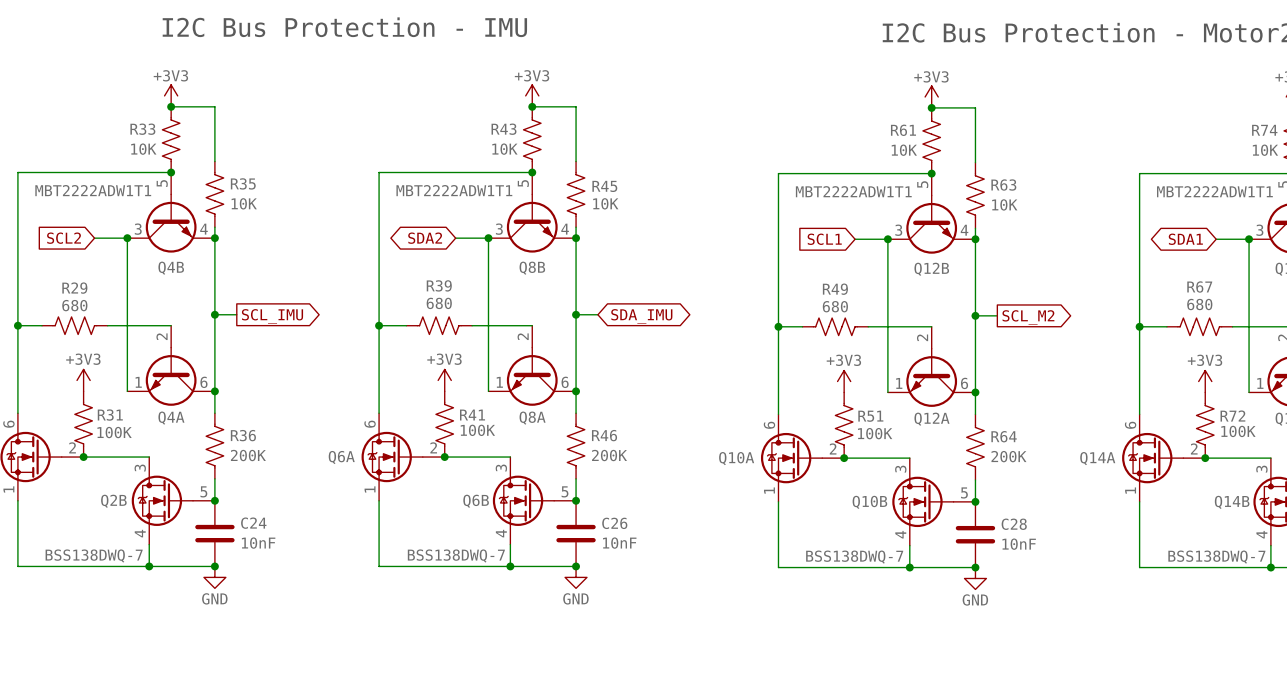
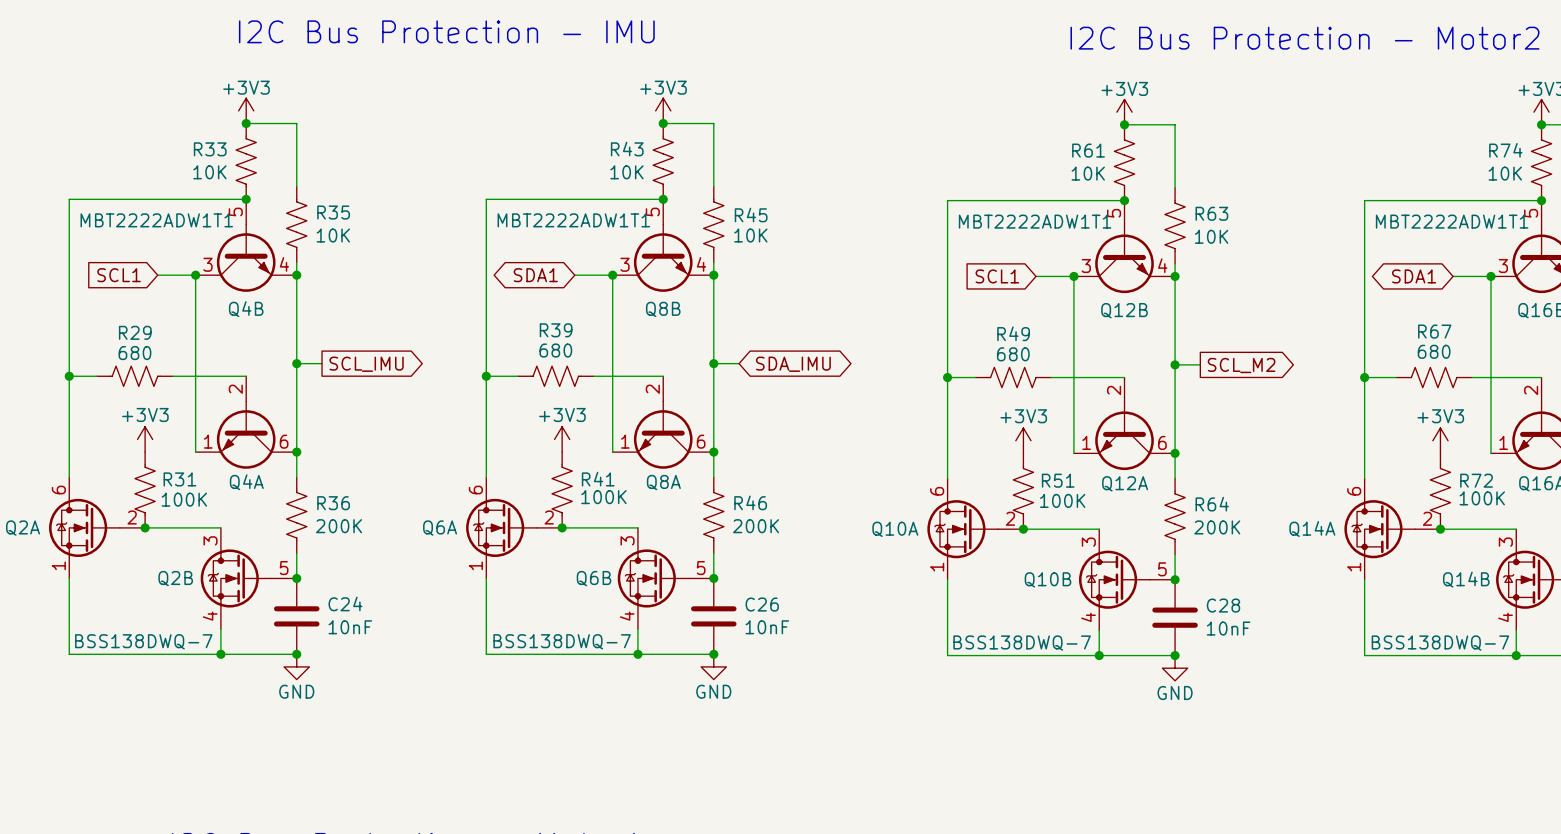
global label: SCL2 (64, 238) -> SCL1 (119, 275)
global label: SDA2 (425, 238) -> SDA1 (535, 275)

